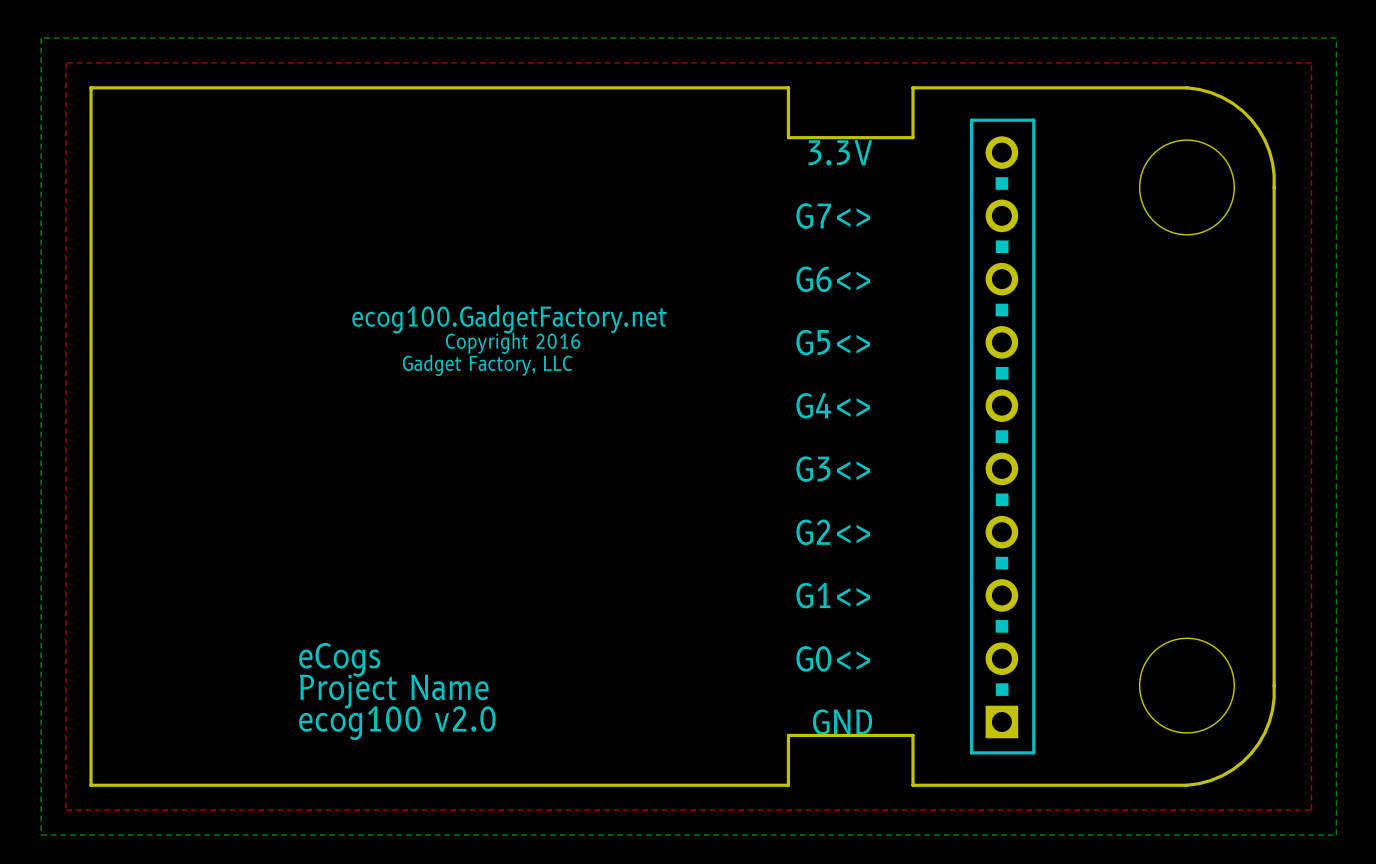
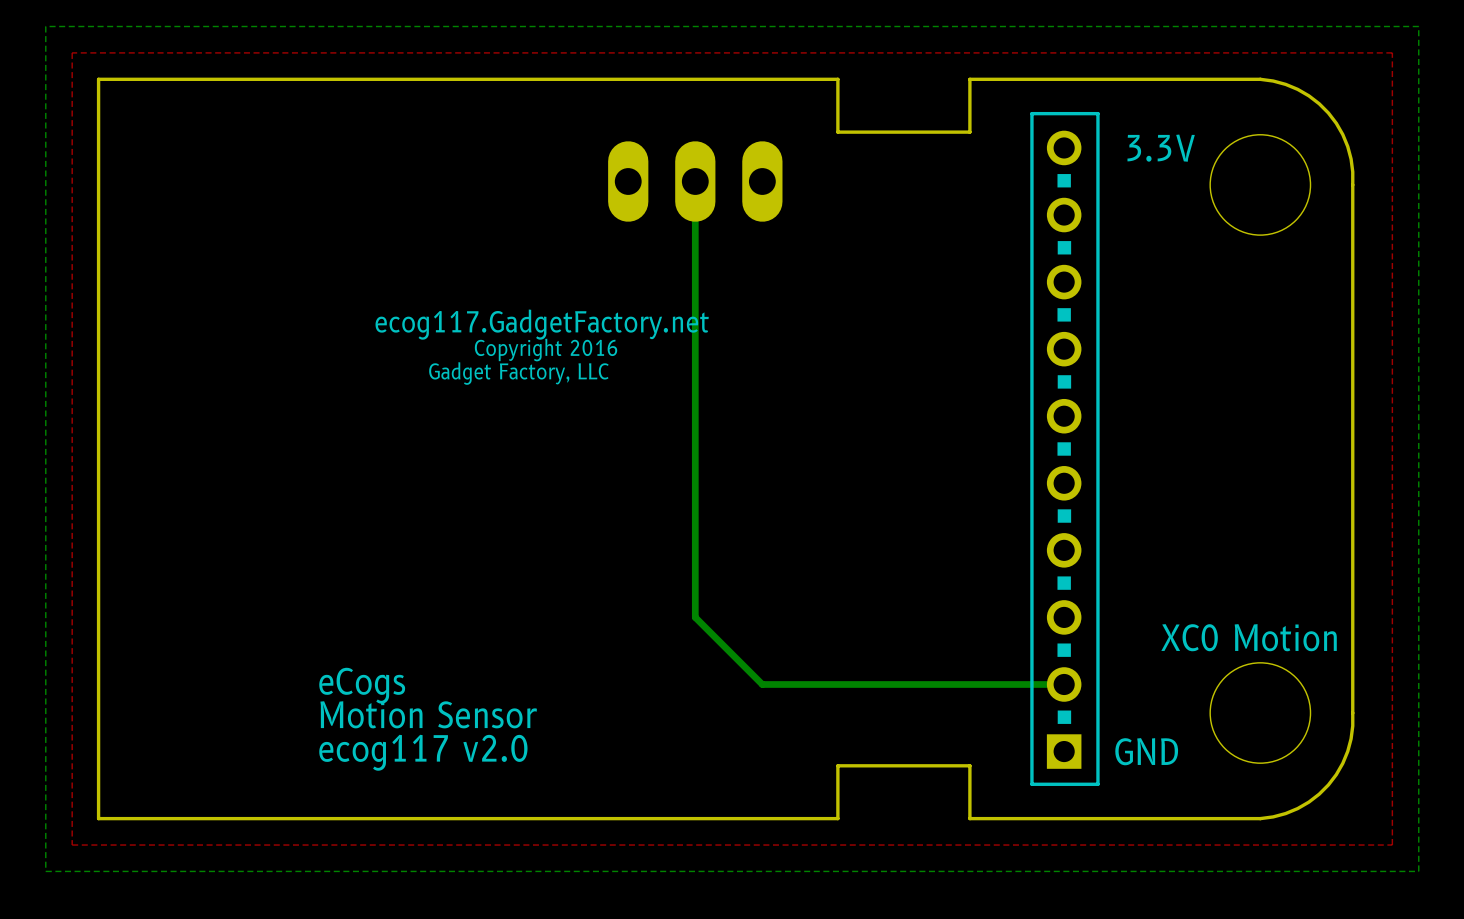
text position: 3.3V (840, 152) -> 3.3V (1161, 148)
bottom track: none -> (695, 181) (695, 617) (762, 684) (1064, 684)
part: none -> (695, 181)
text: G7<> (833, 216) -> none
text: G6<> (833, 279) -> none
text: ecog100.GadgetFactory.net (509, 319) -> ecog117.GadgetFactory.net (542, 324)
text: G5<> (833, 342) -> none
text: G4<> (833, 405) -> none
text: G3<> (833, 469) -> none
text: G2<> (833, 532) -> none
text: G1<> (833, 595) -> none
text: none -> XC0 Motion (1249, 637)
text: G0<> (833, 658) -> none
text: Project Name (394, 691) -> Motion Sensor (428, 714)
text position: GND (842, 722) -> GND (1146, 751)
text: ecog100 v2.0 (397, 723) -> ecog117 v2.0 (423, 752)

